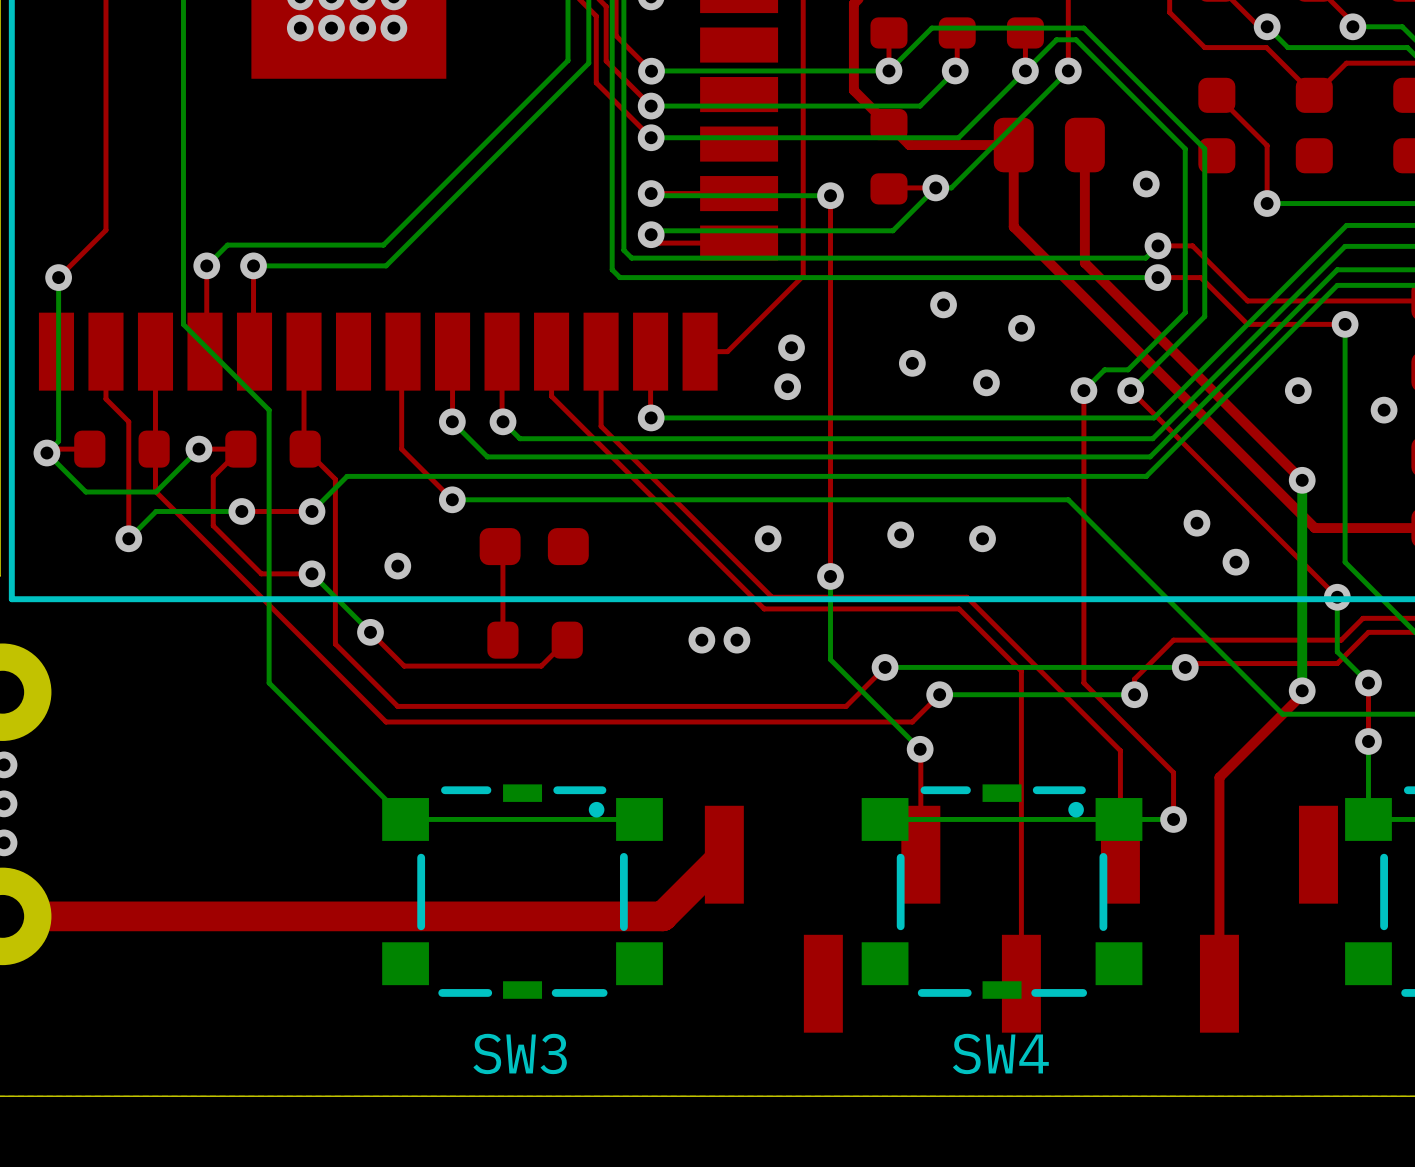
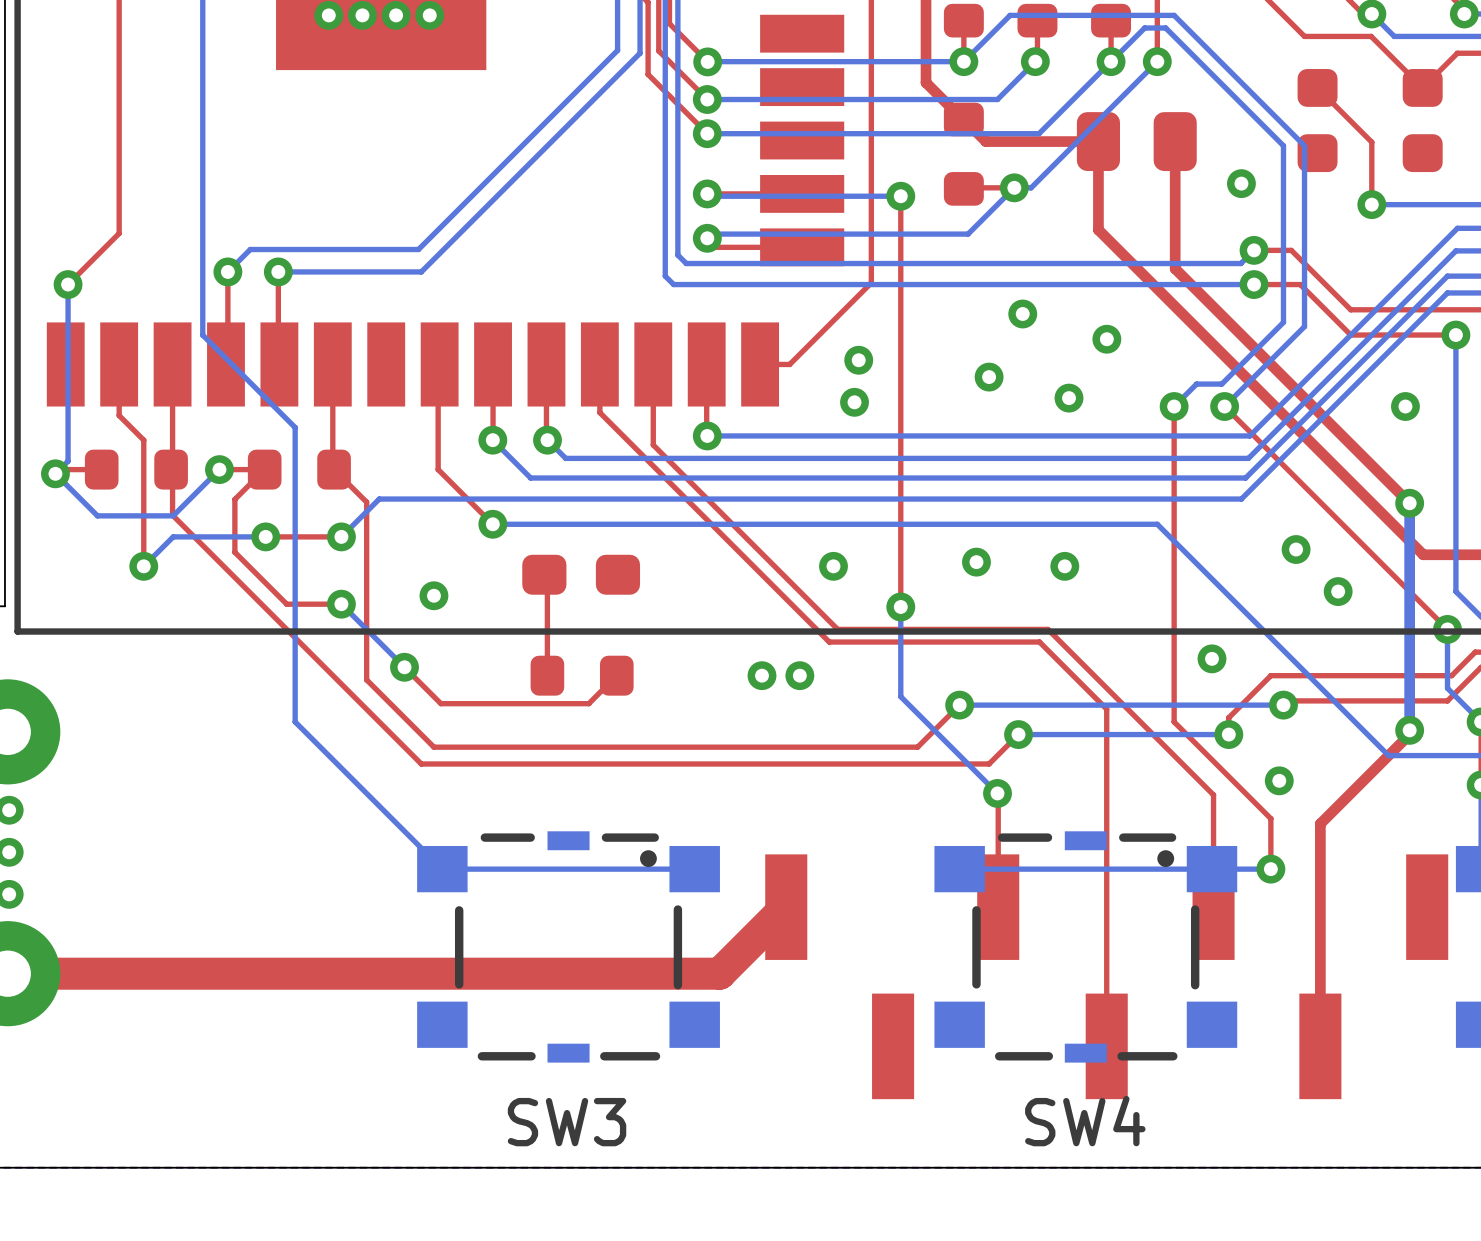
via: none -> (1211, 658)
via: none -> (1279, 780)

